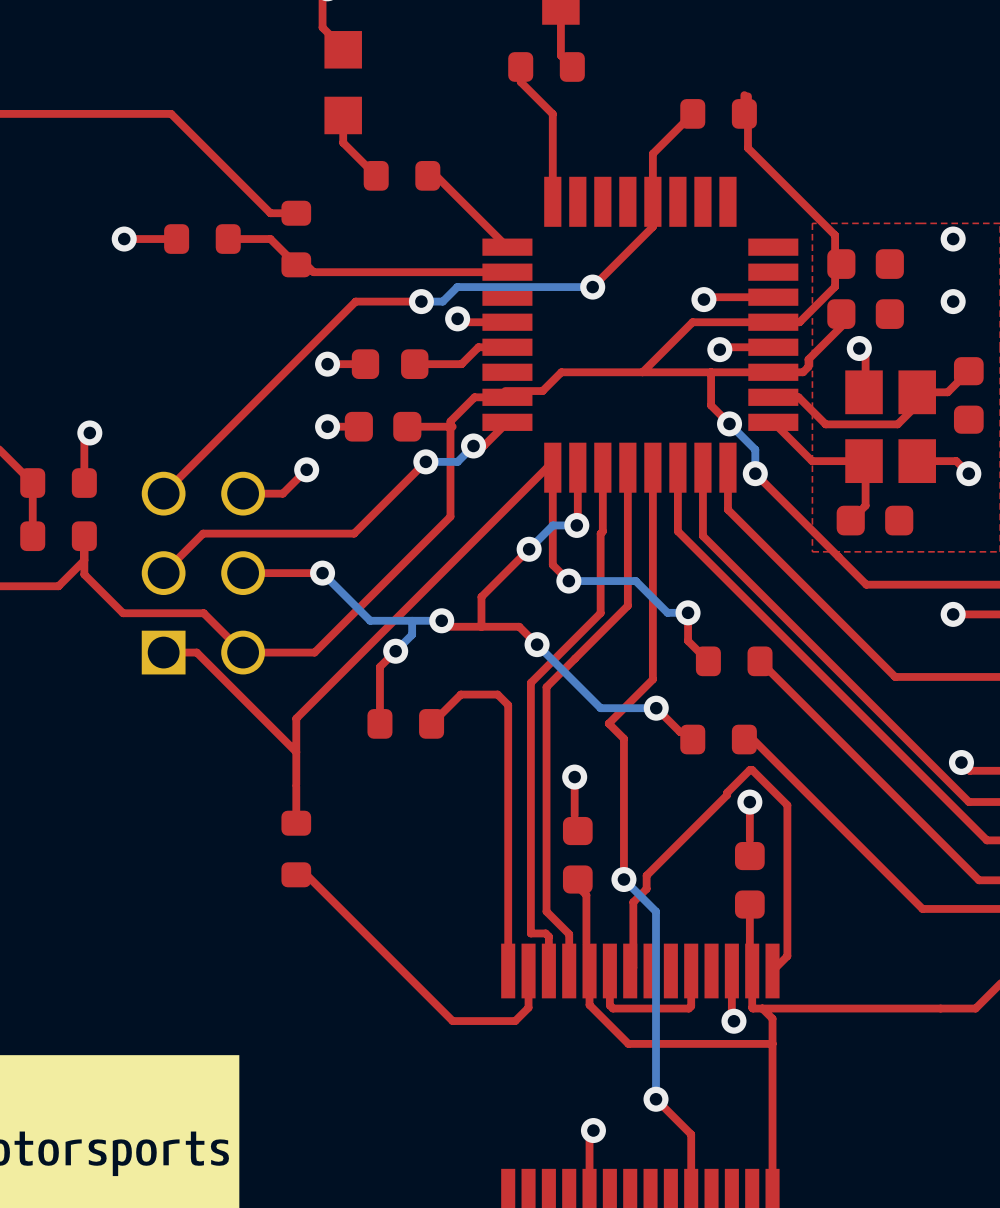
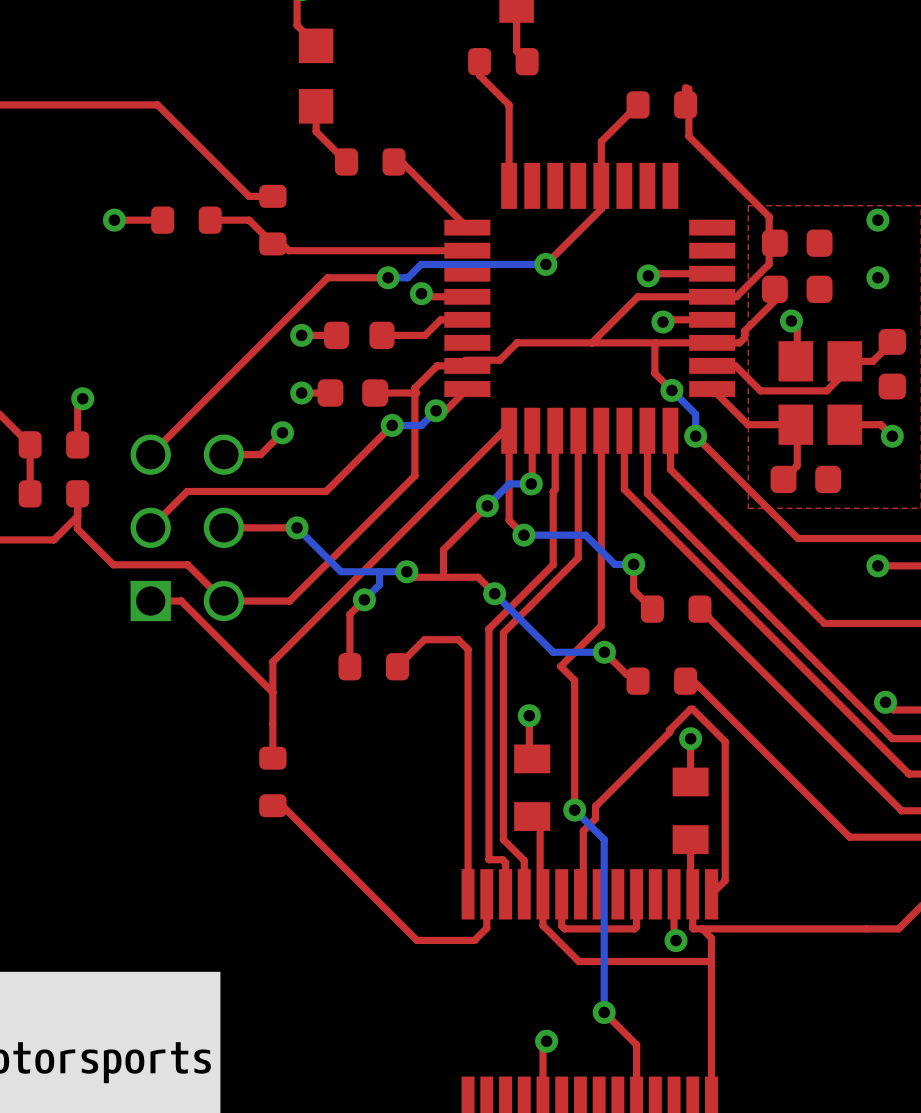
part footprint: [562, 816, 593, 894] -> [514, 744, 551, 831]
part footprint: [734, 841, 765, 919] -> [672, 767, 709, 854]

